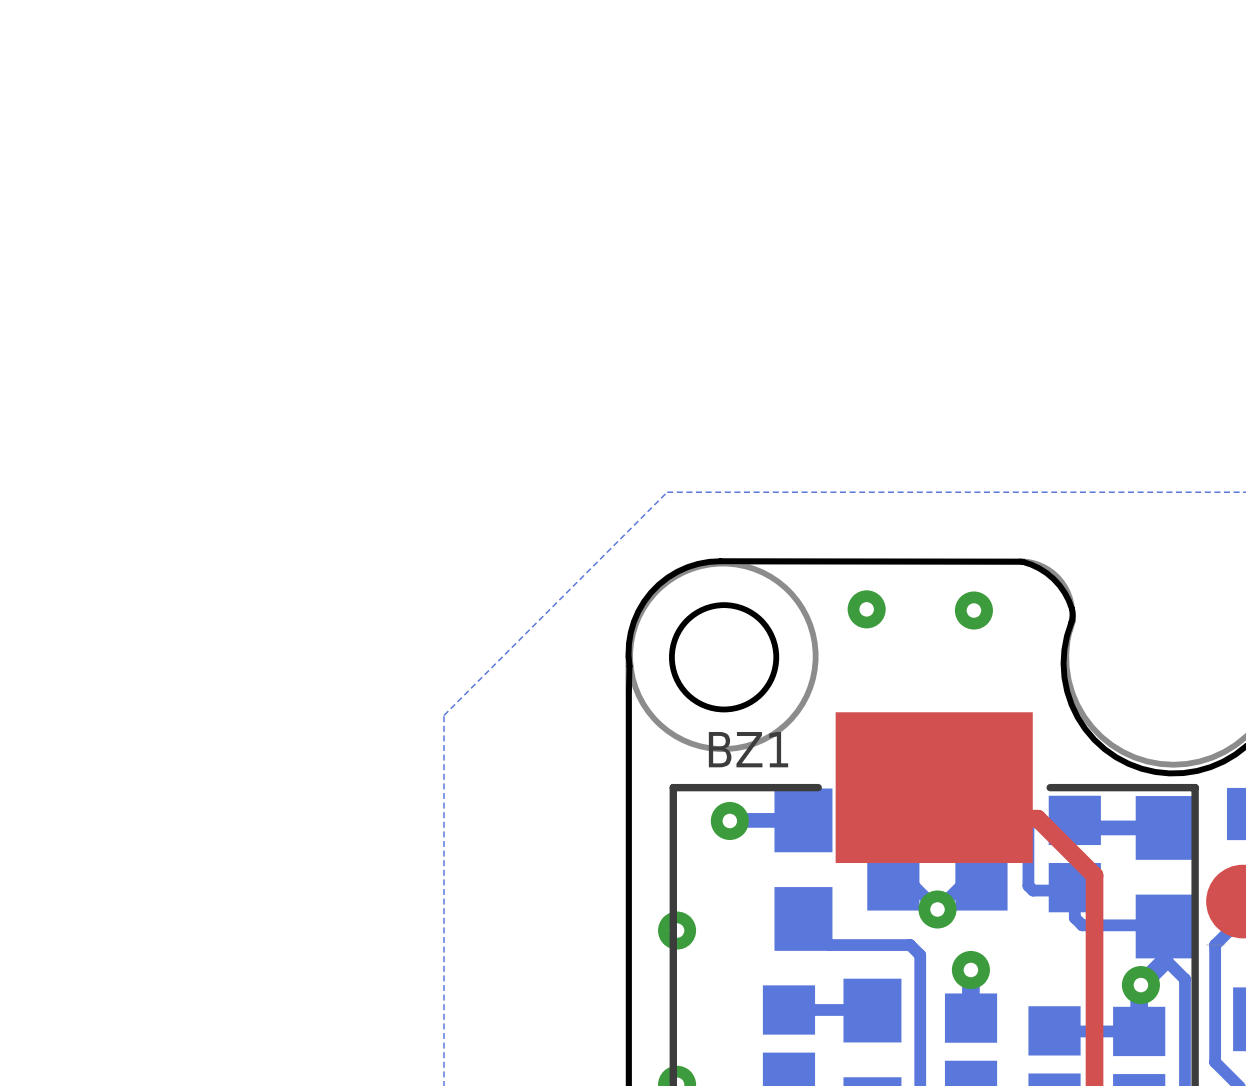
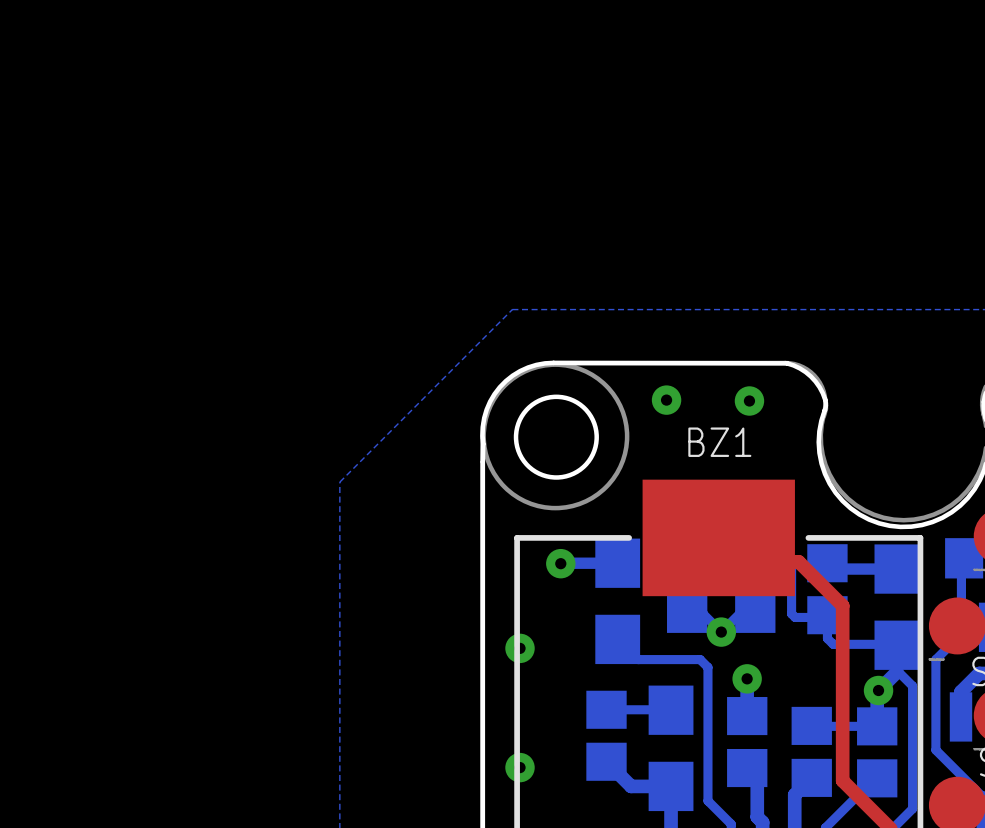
BZ1 name position: BZ1 (748, 749) -> BZ1 (719, 442)

